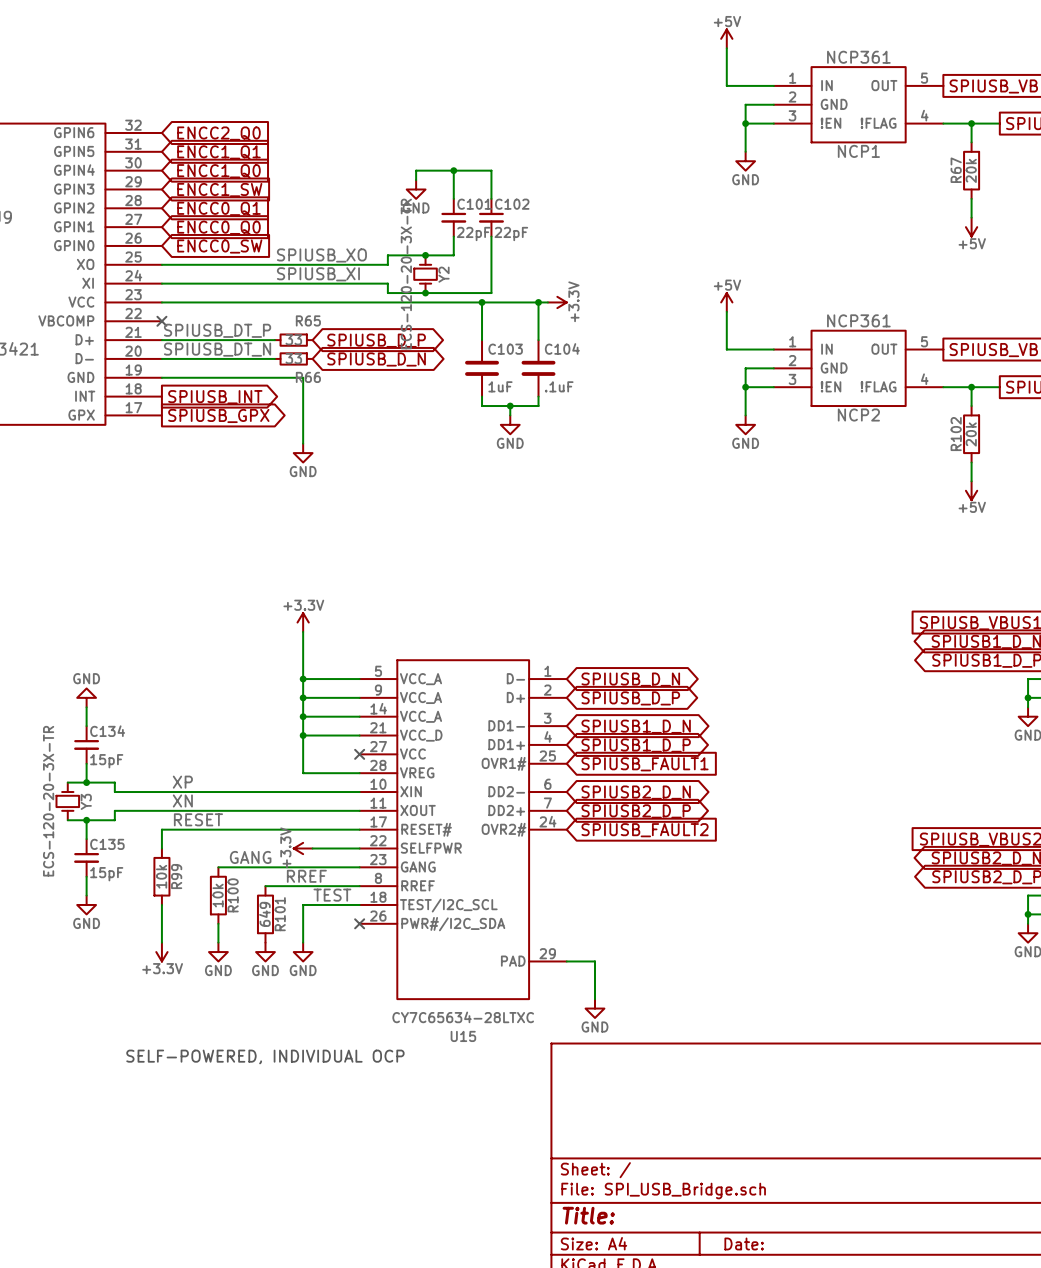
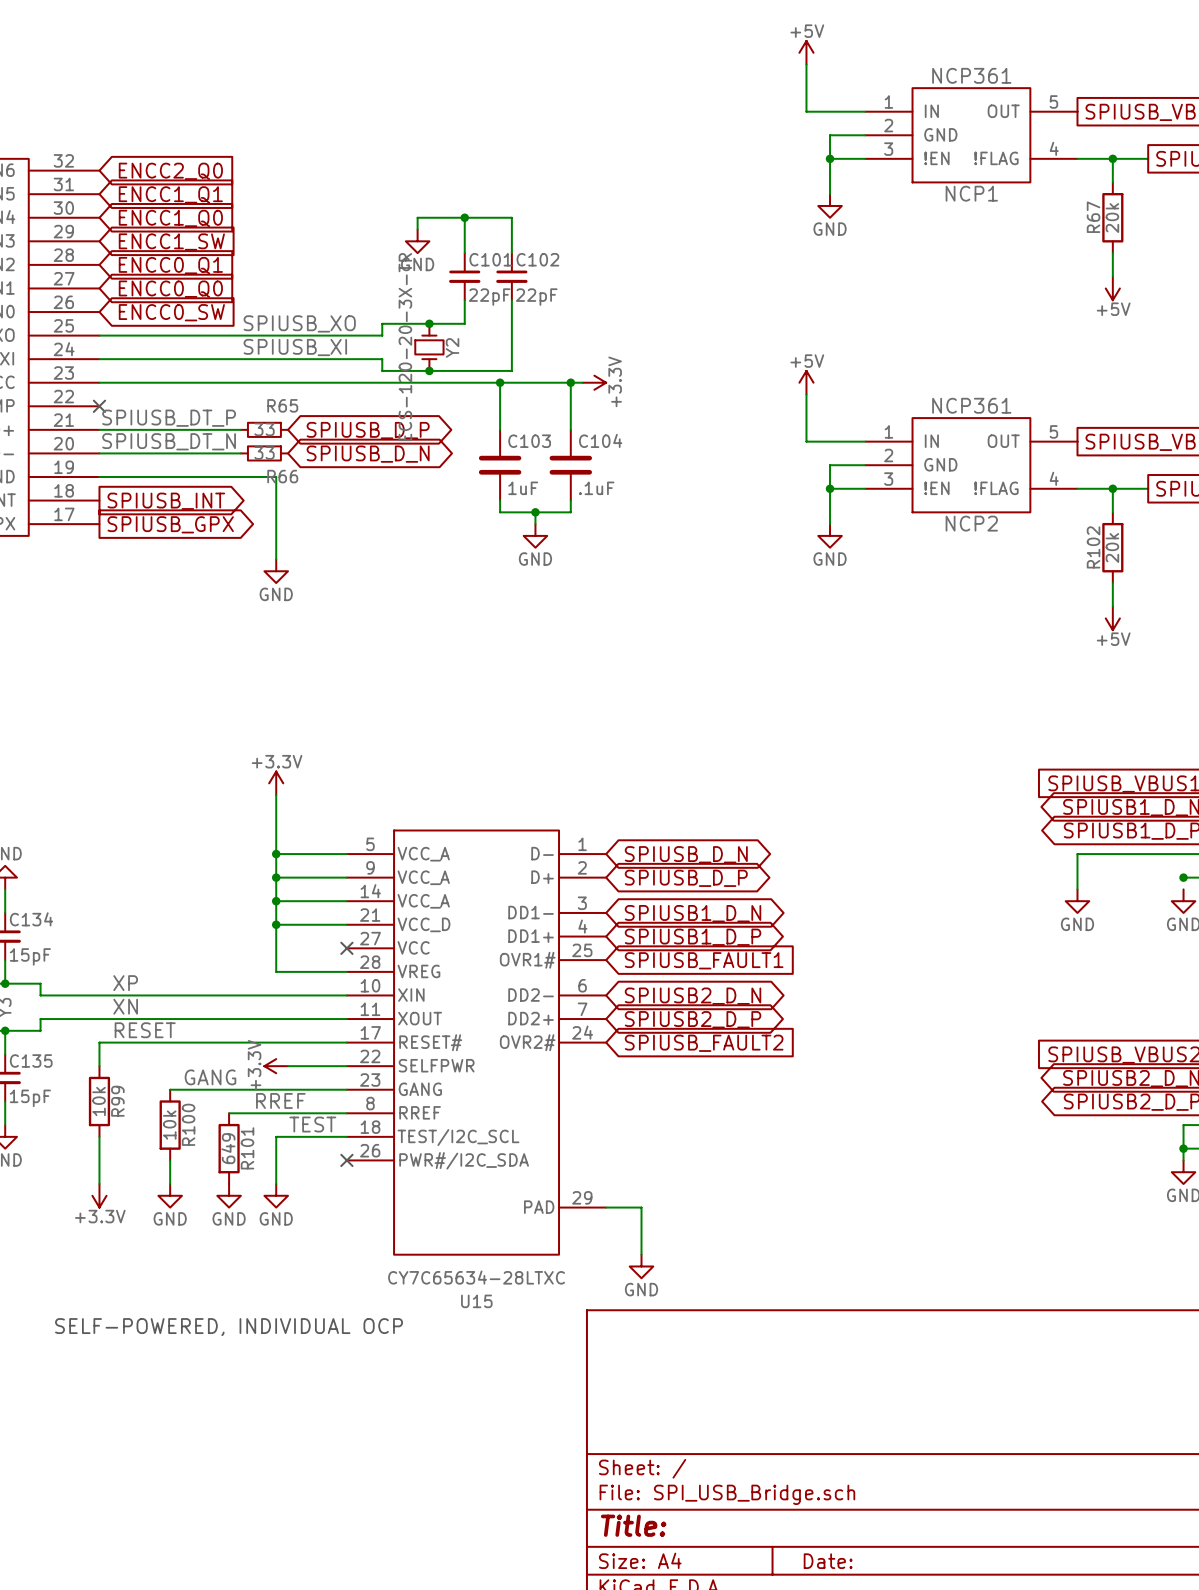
wire: (1028, 679) (1028, 707) -> (1183, 854) (1077, 854) (1077, 889)
power symbol: none -> GND (1077, 901)

